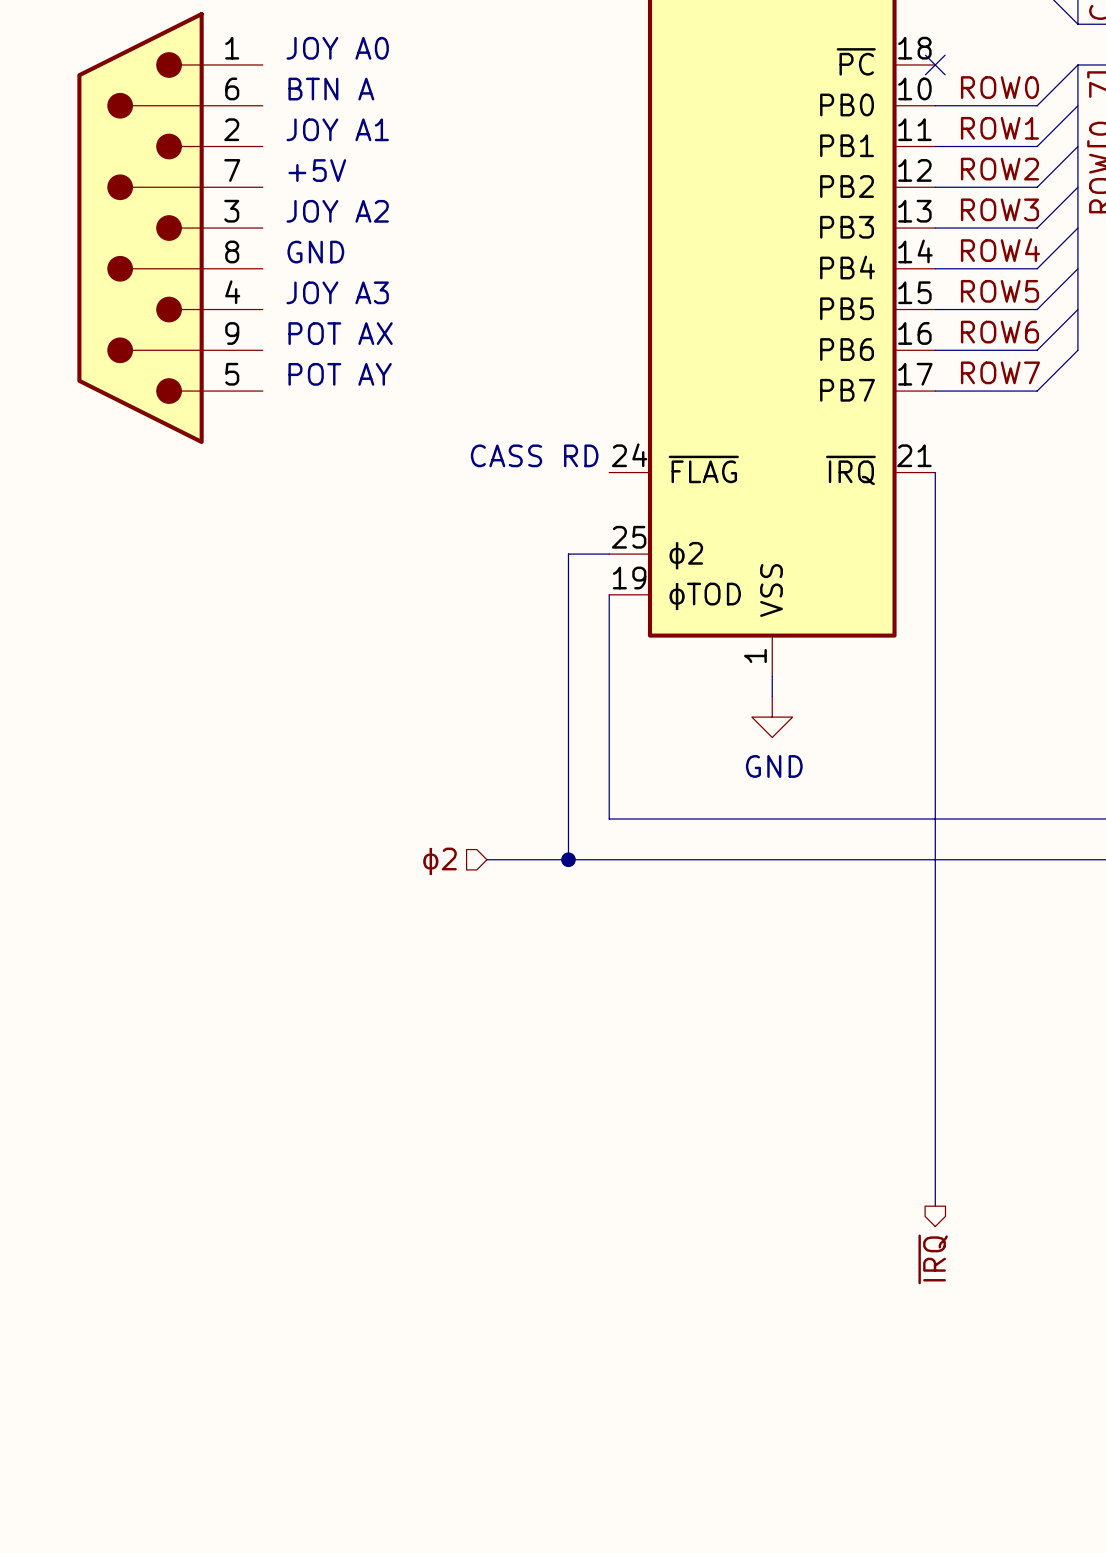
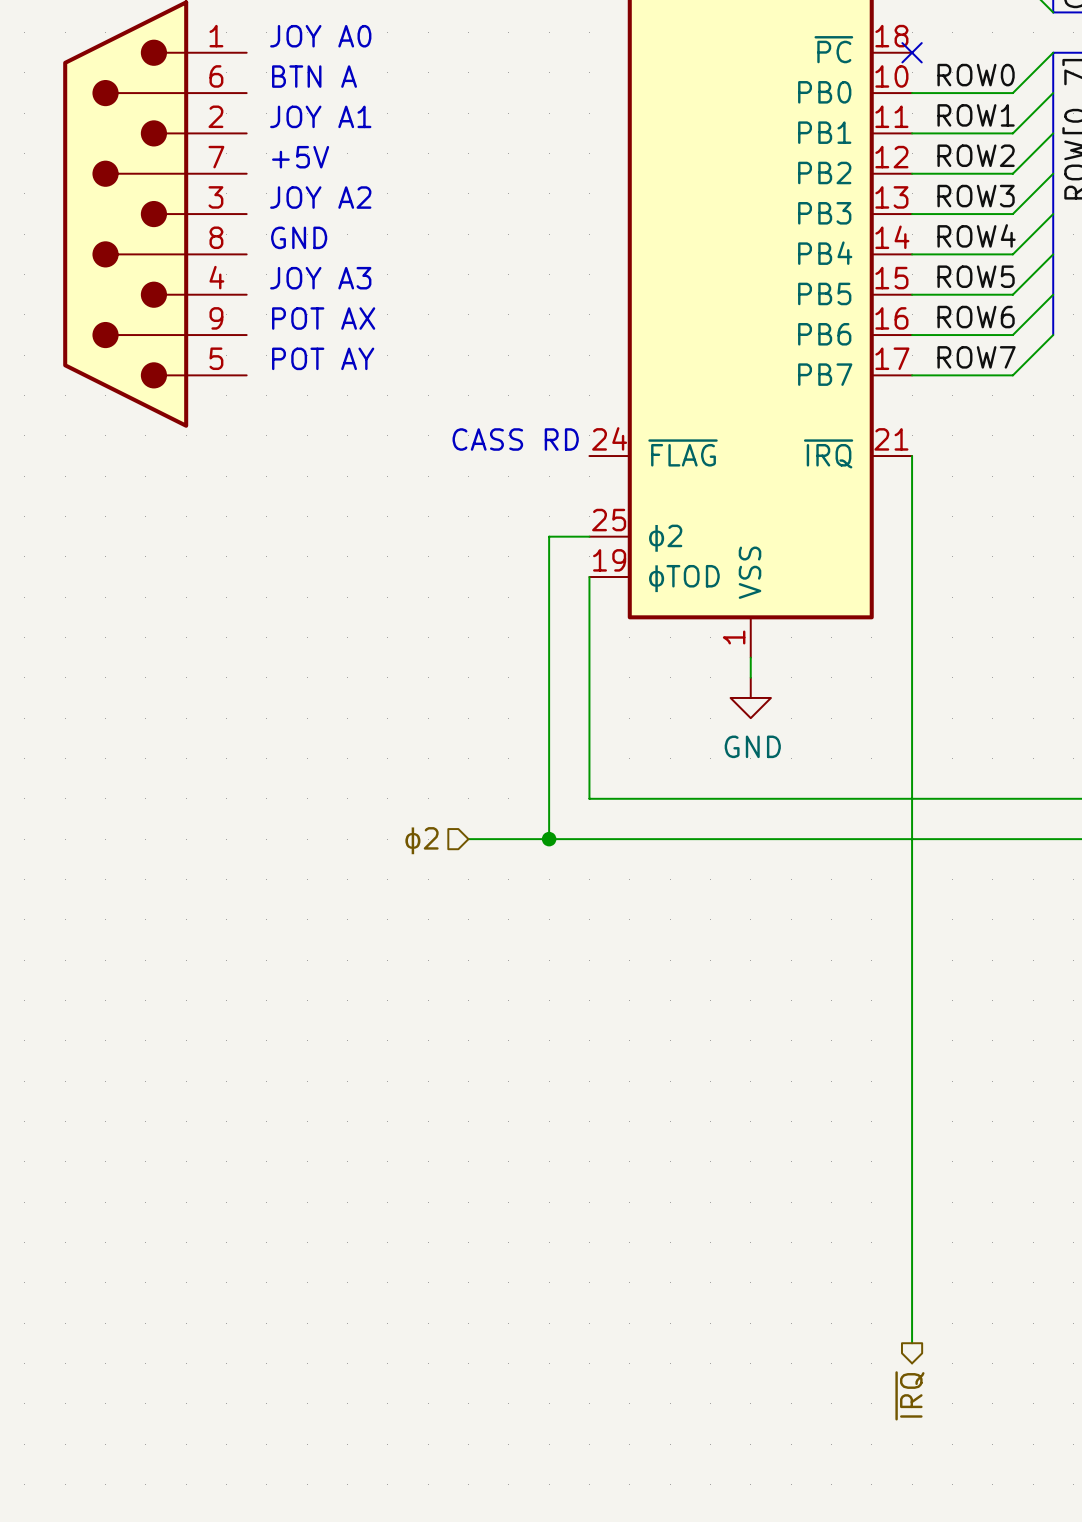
wire: none -> (912, 1181) (912, 1343)
hierarchical label position: ~{IRQ} (933, 1259) -> ~{IRQ} (909, 1395)

